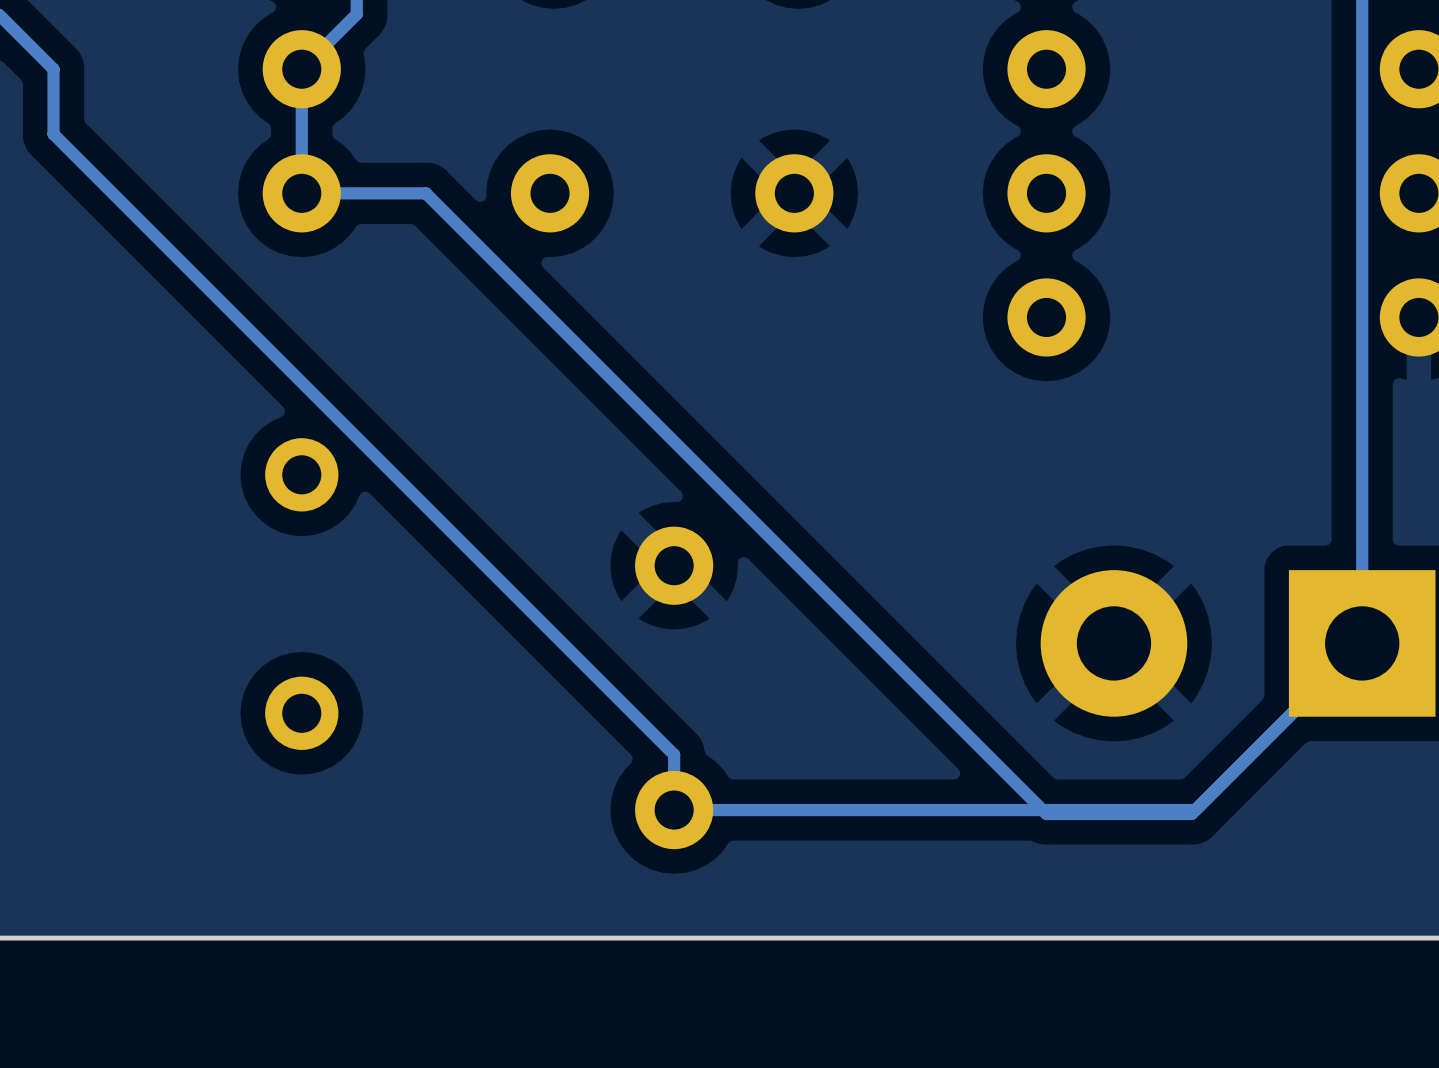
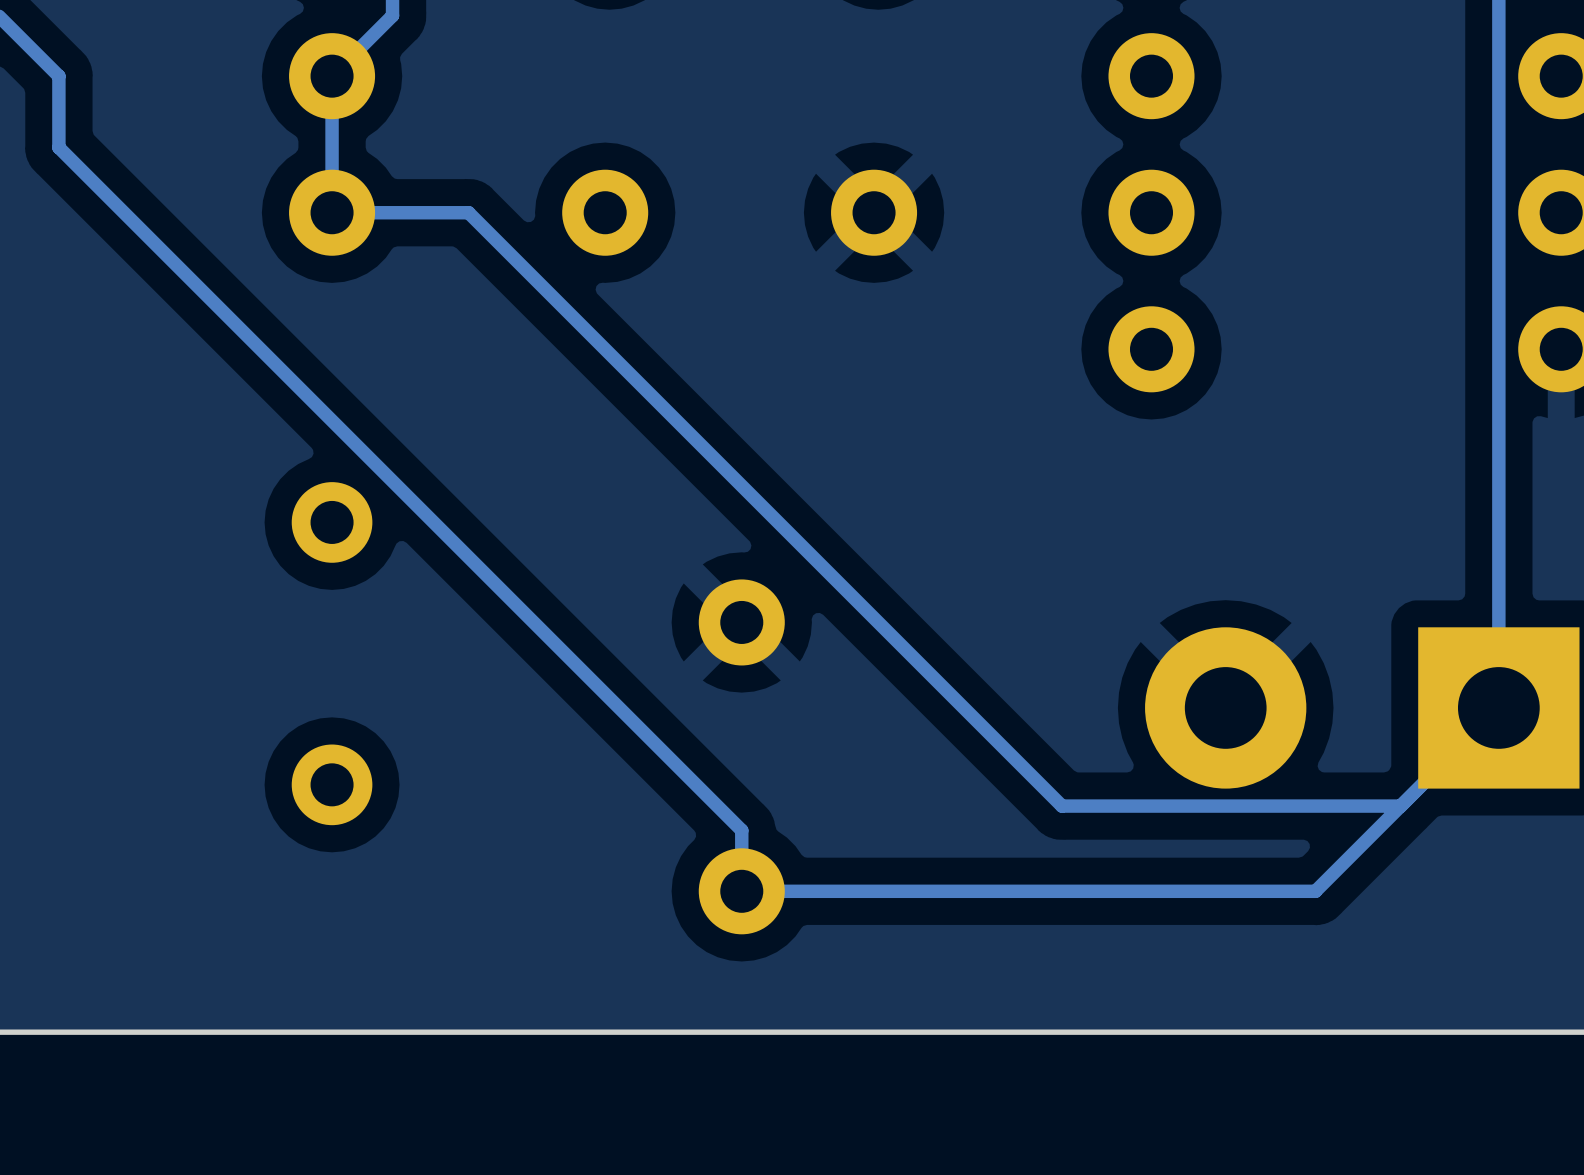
track: (965, 732) (1046, 813) (1191, 813) (1195, 810) -> (1061, 806) (1400, 806)

